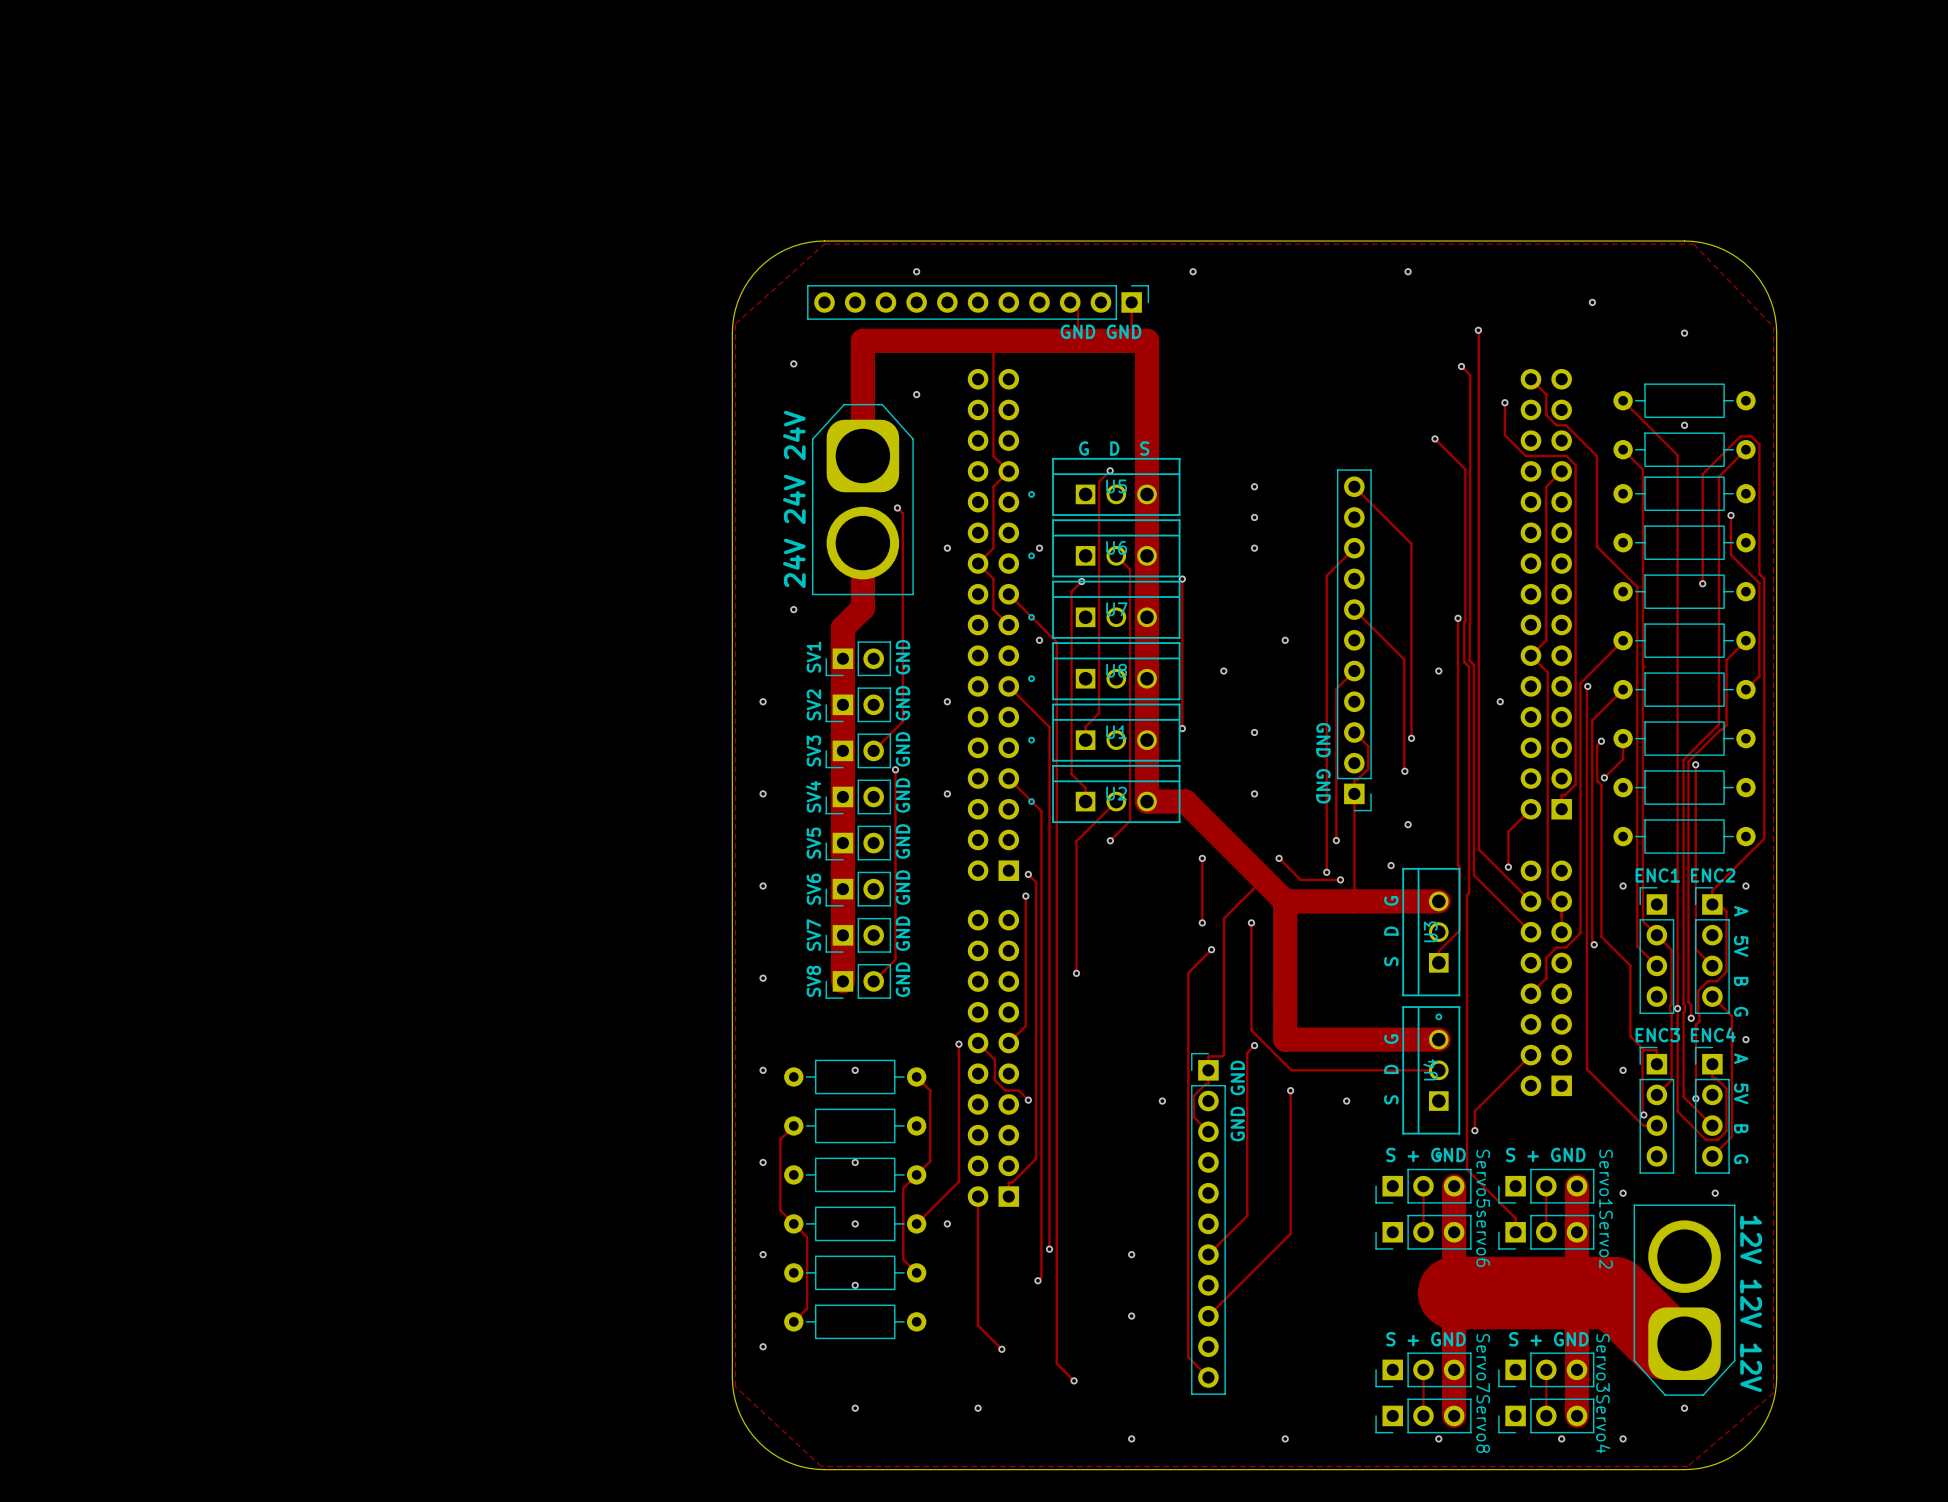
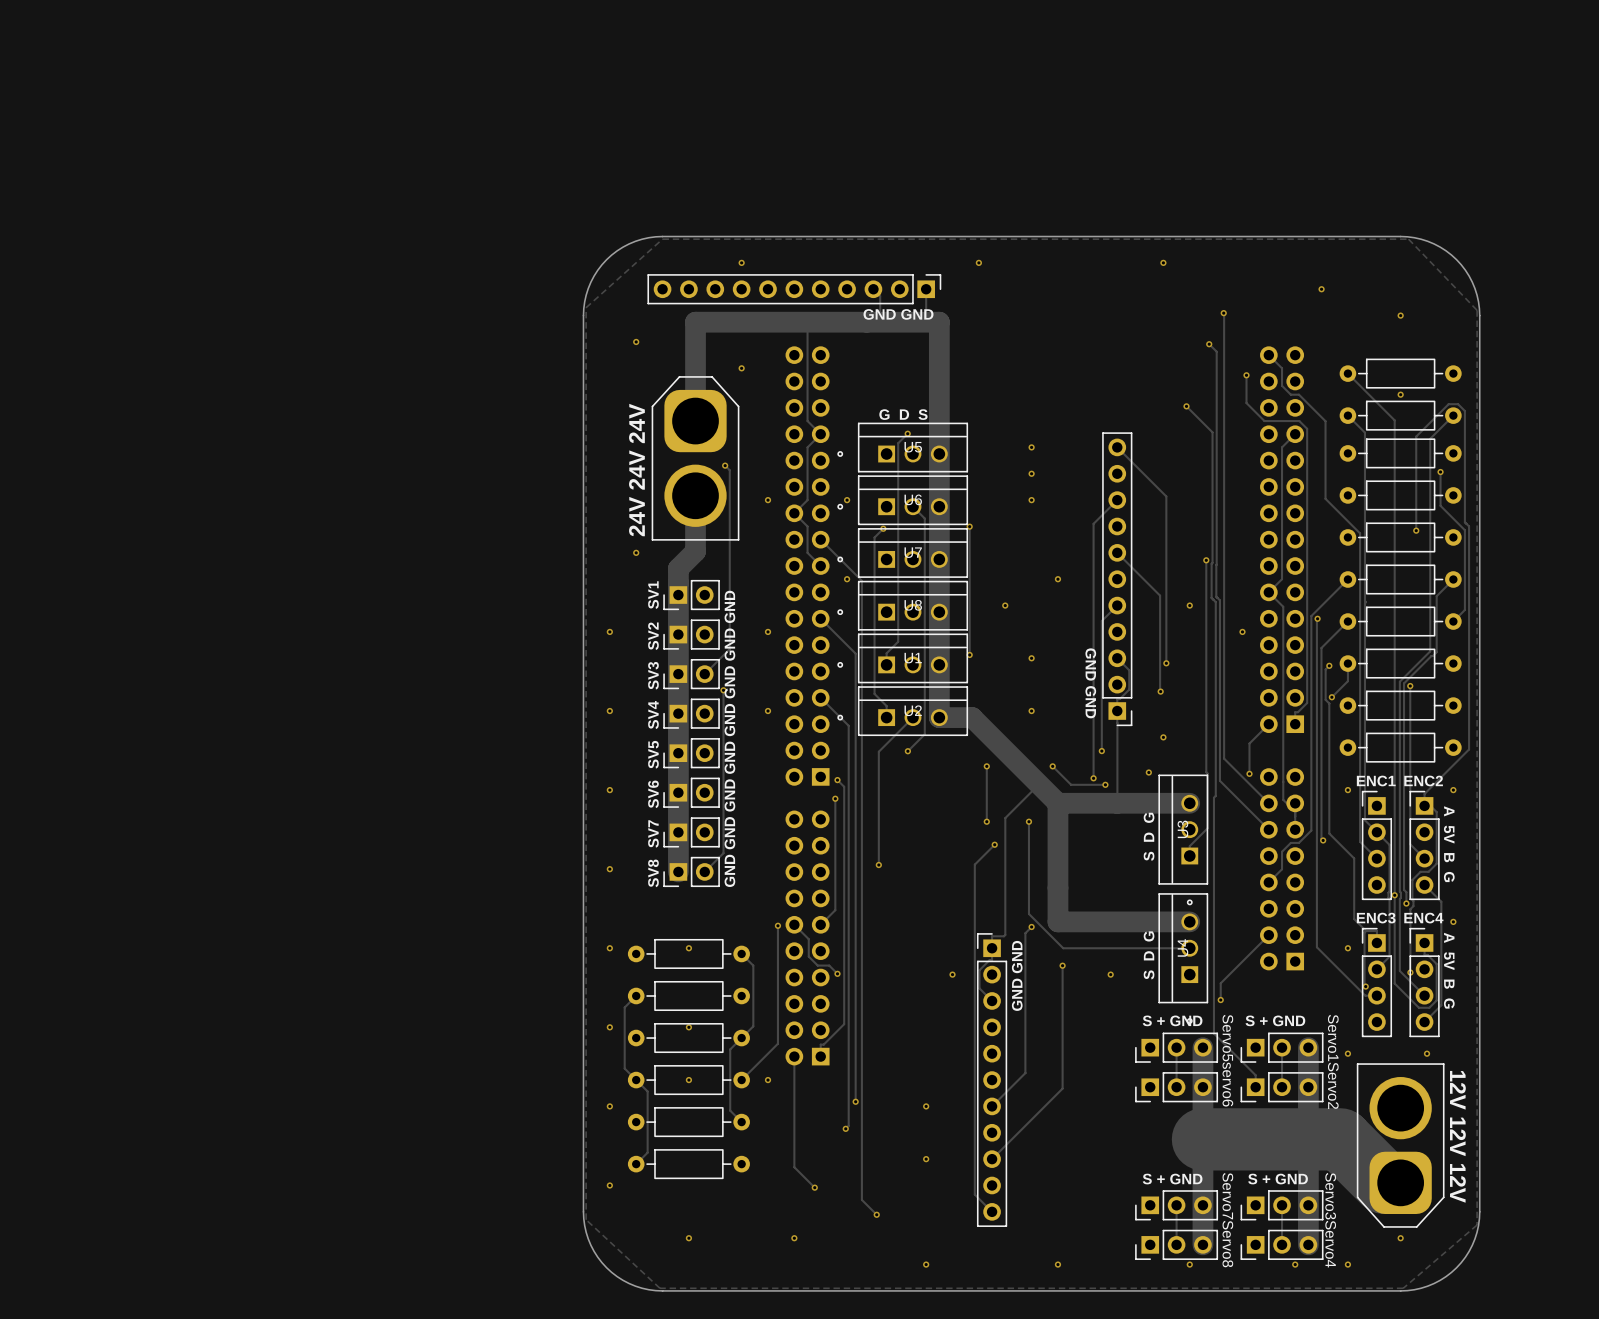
via: (855, 1285) -> none

